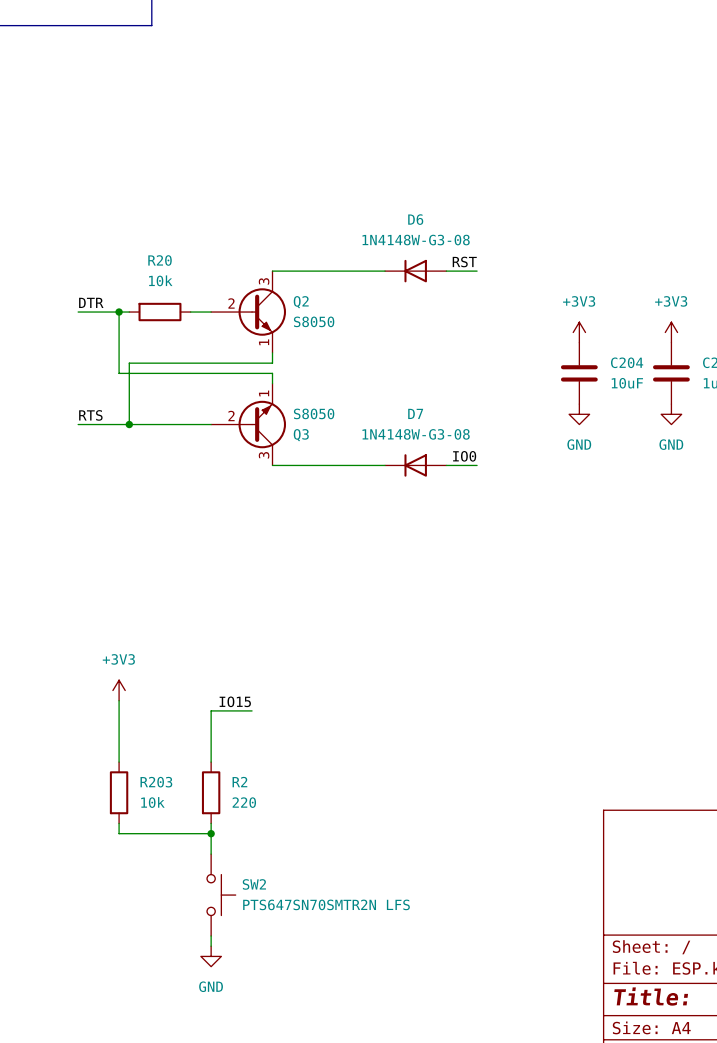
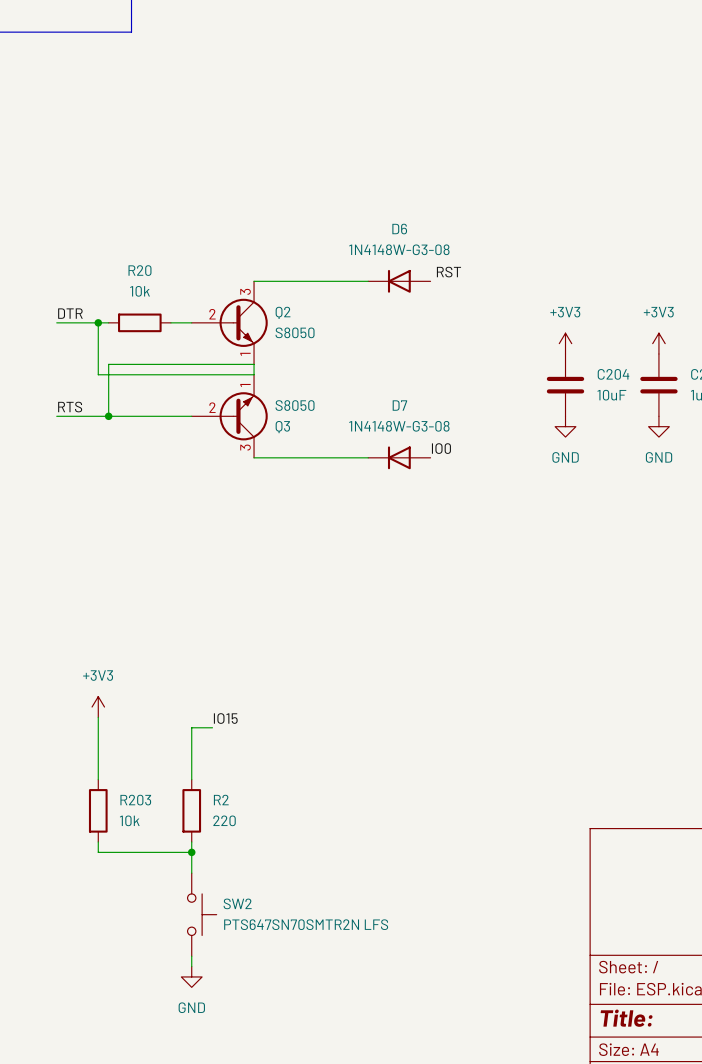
wire: (446, 271) (477, 271) -> none
wire: (119, 363) (119, 373) (272, 373) (272, 383) -> (98, 374) (108, 374) (108, 364) (254, 364)
wire: (129, 404) (129, 424) -> none
label position: RTS (90, 415) -> RTS (70, 407)
wire: (78, 424) (211, 424) -> (56, 416) (191, 416)
junction position: (129, 424) -> (108, 416)
Q3 position: (248, 424) -> (229, 416)
label position: IO0 (464, 456) -> IO0 (441, 448)
wire: (272, 465) (385, 465) -> (254, 457) (368, 457)
D7 position: (415, 465) -> (399, 457)
wire: (446, 465) (477, 465) -> none
label position: IO15 (235, 701) -> IO15 (225, 718)
wire: (231, 710) (252, 710) -> none

